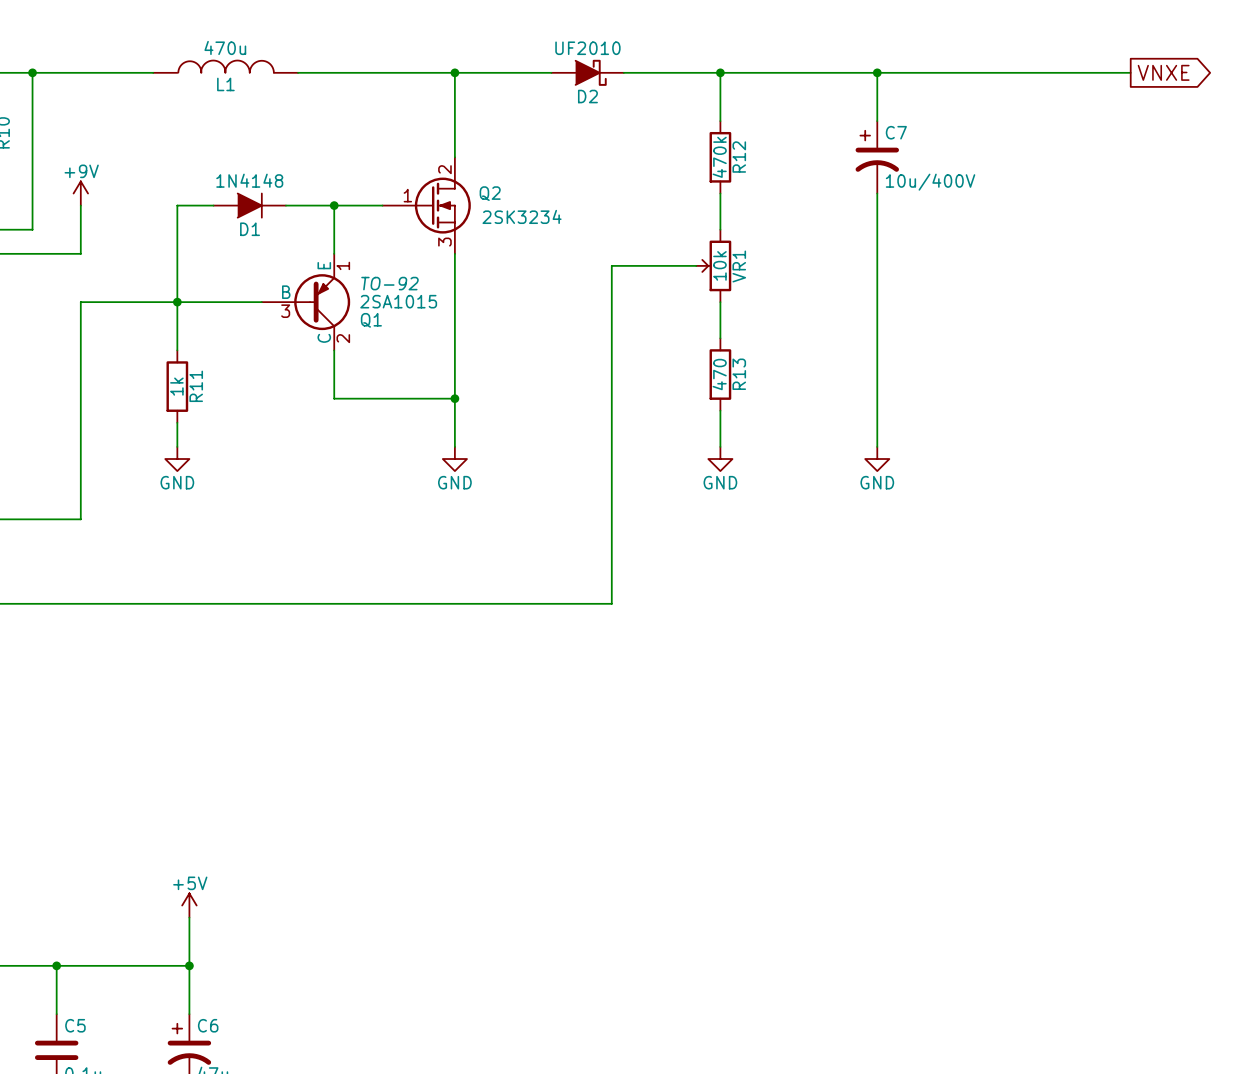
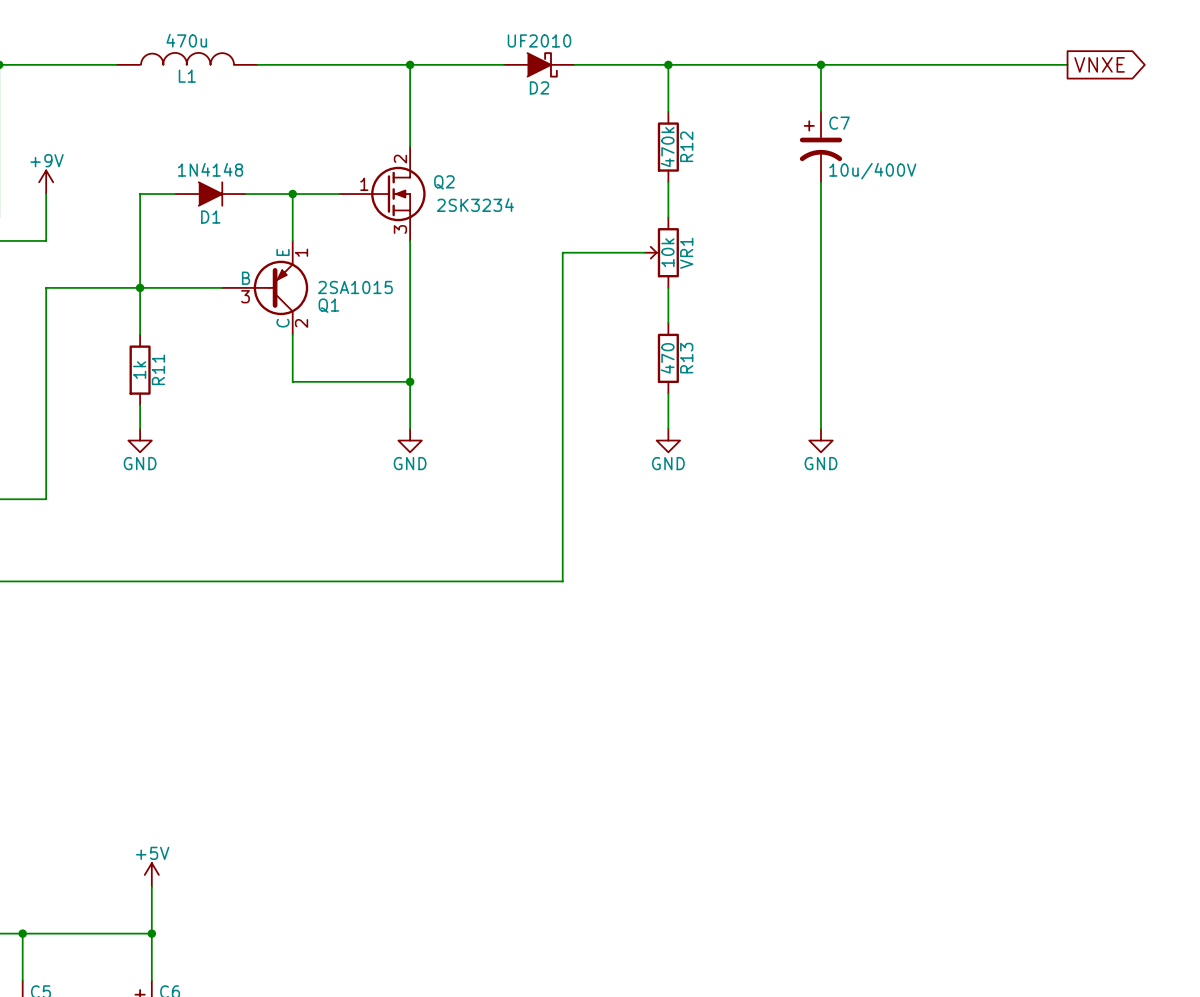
Q1 text: TO-92 (389, 283) -> none

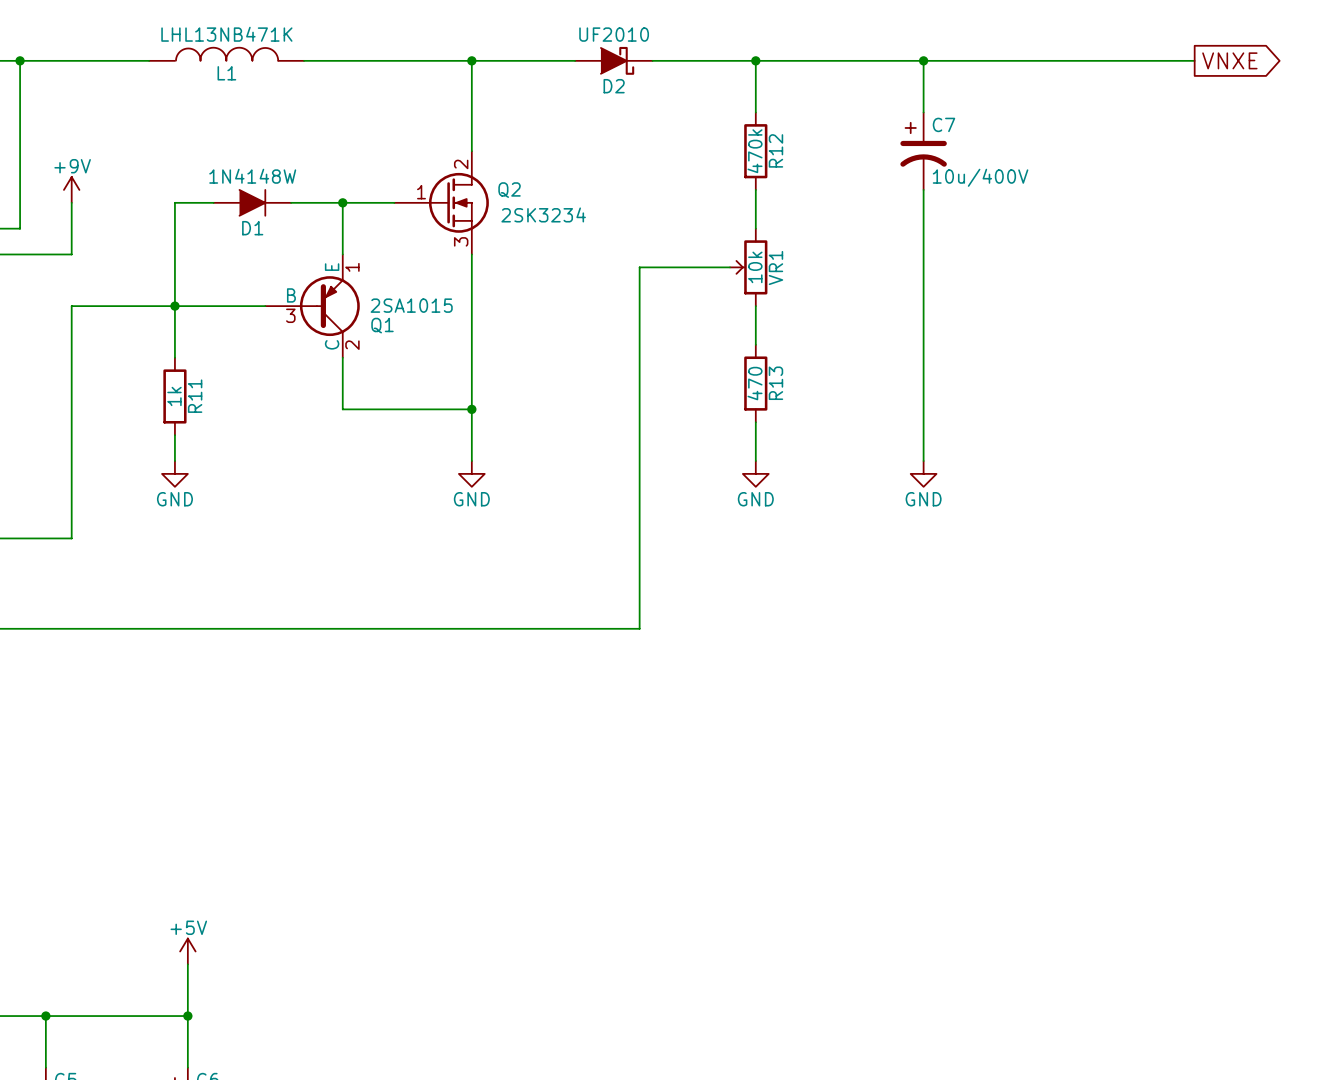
L1 value: 470u (186, 40) -> LHL13NB471K (226, 34)
D1 value: 1N4148 (210, 169) -> 1N4148W (252, 176)

